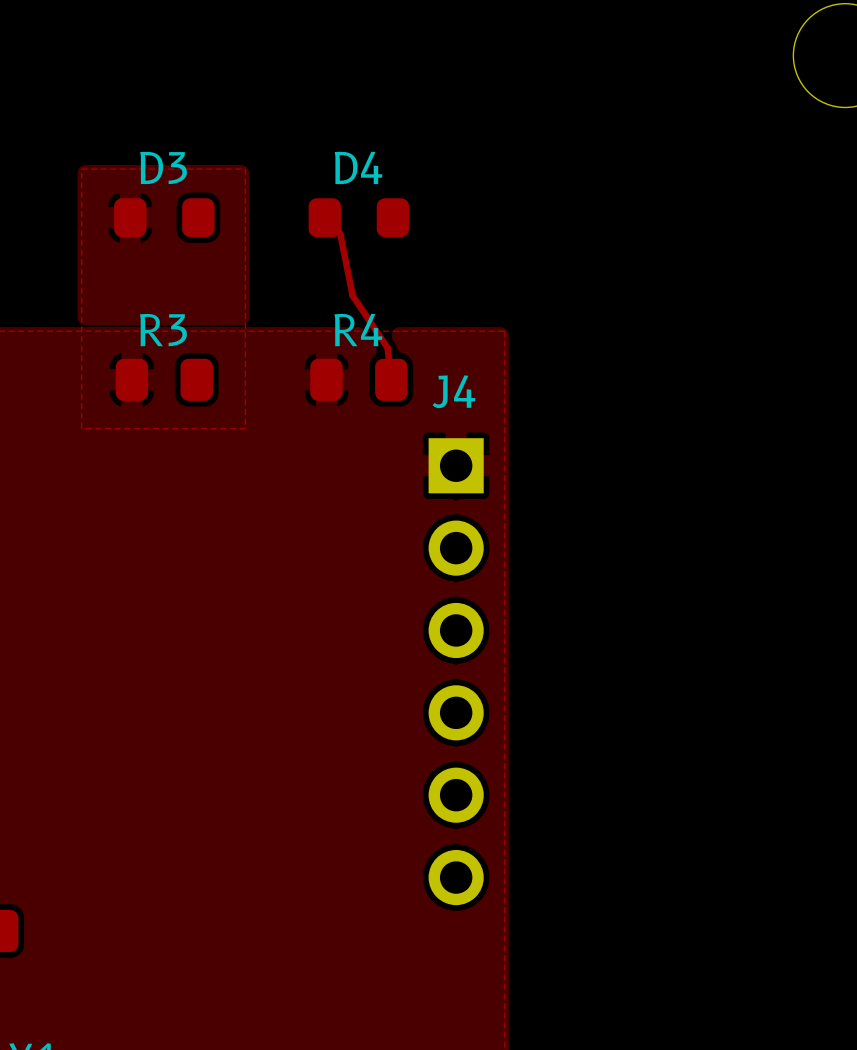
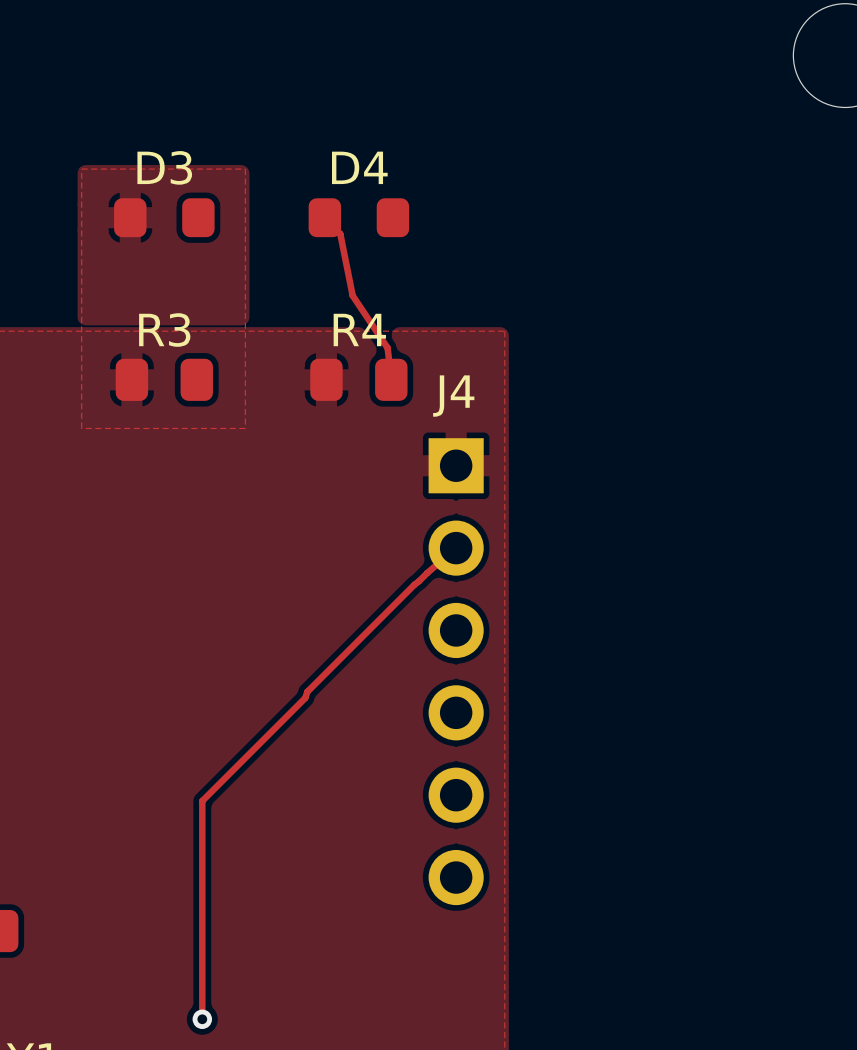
track: none -> (456, 548) (414, 584) (202, 801) (202, 1019)
via: none -> (202, 1019)

